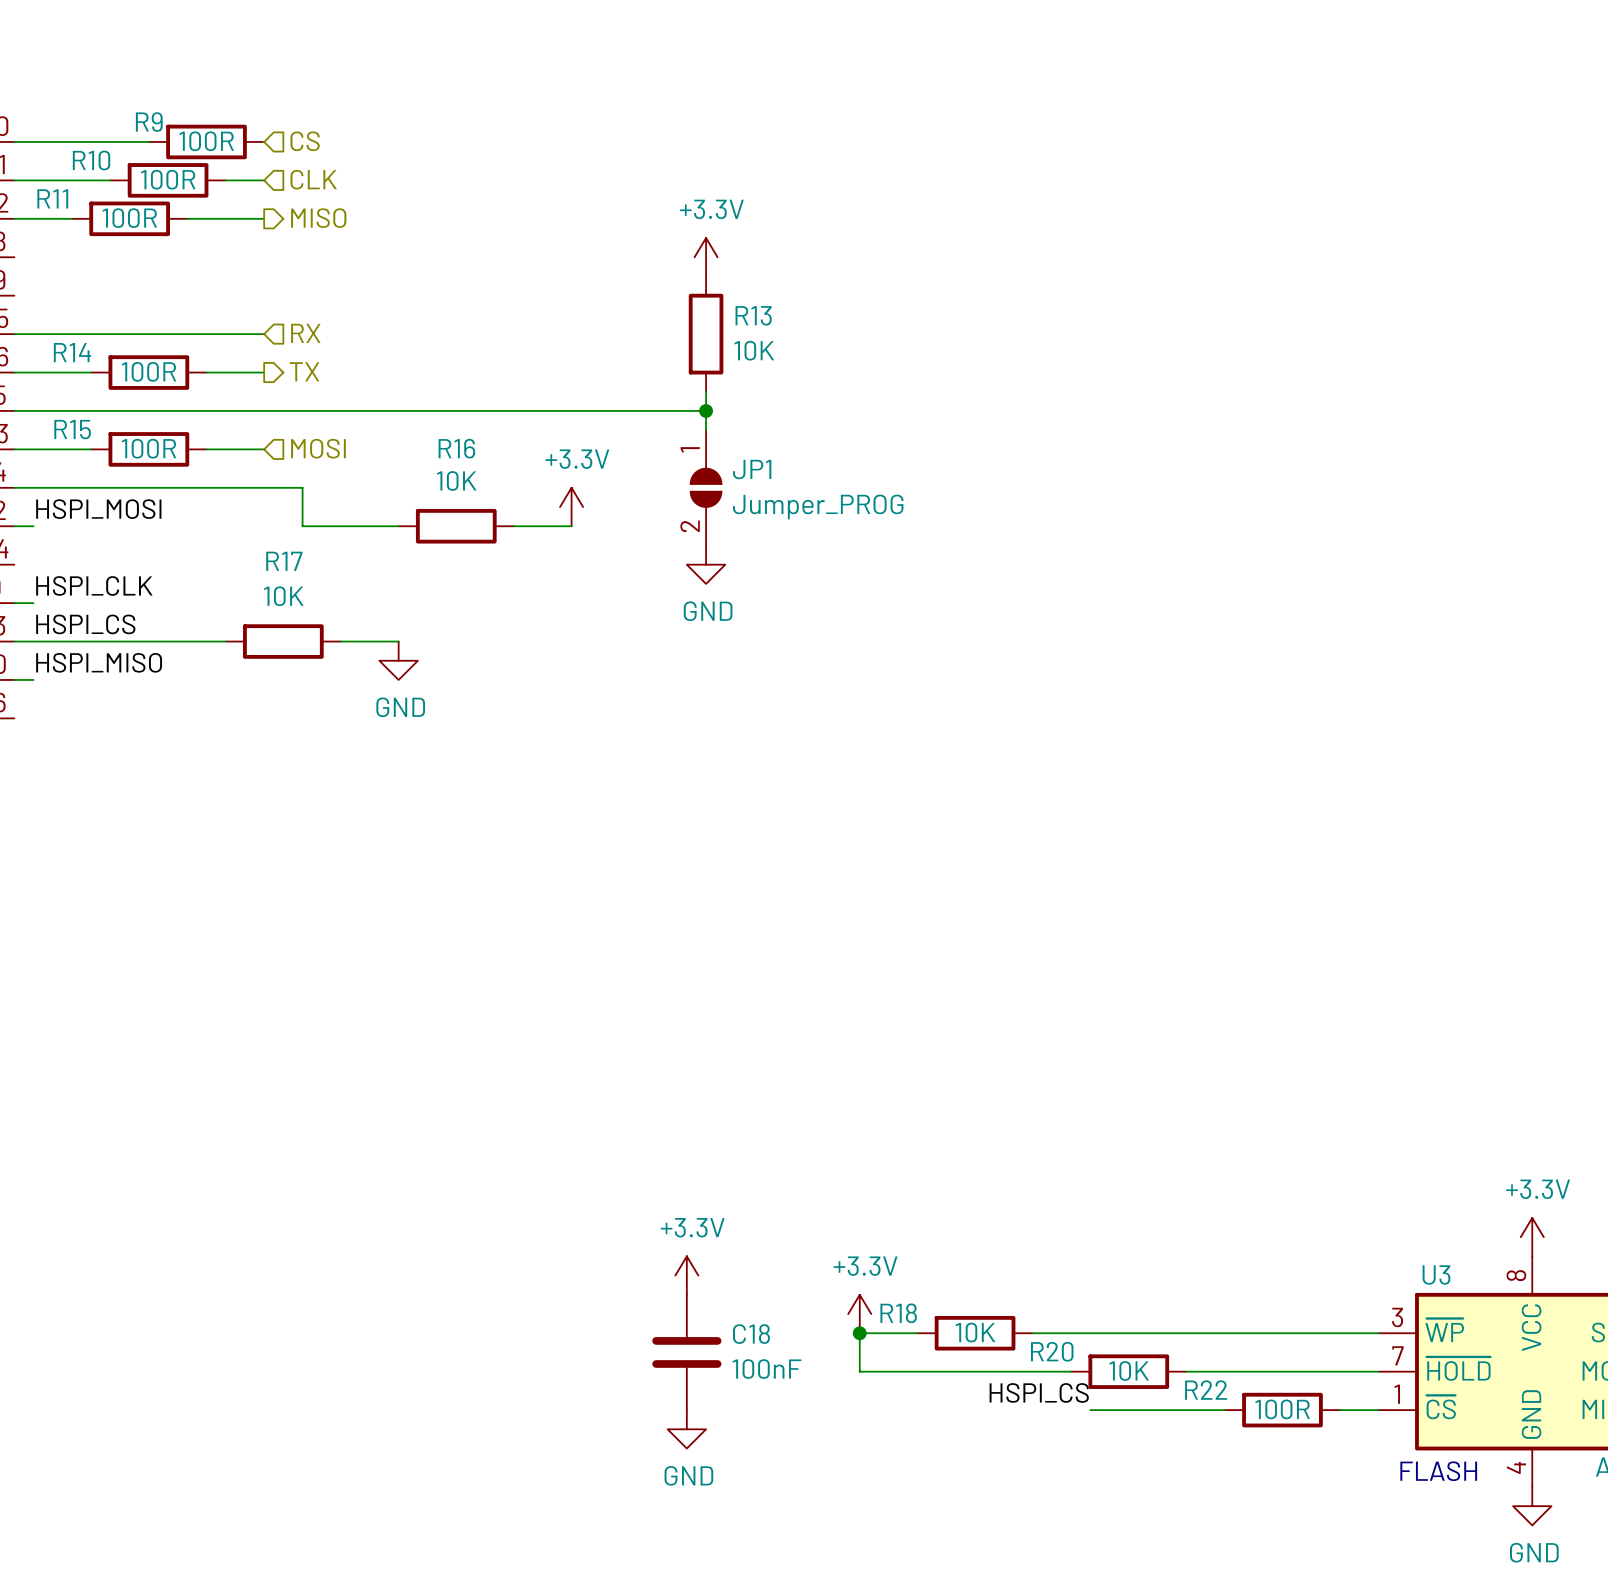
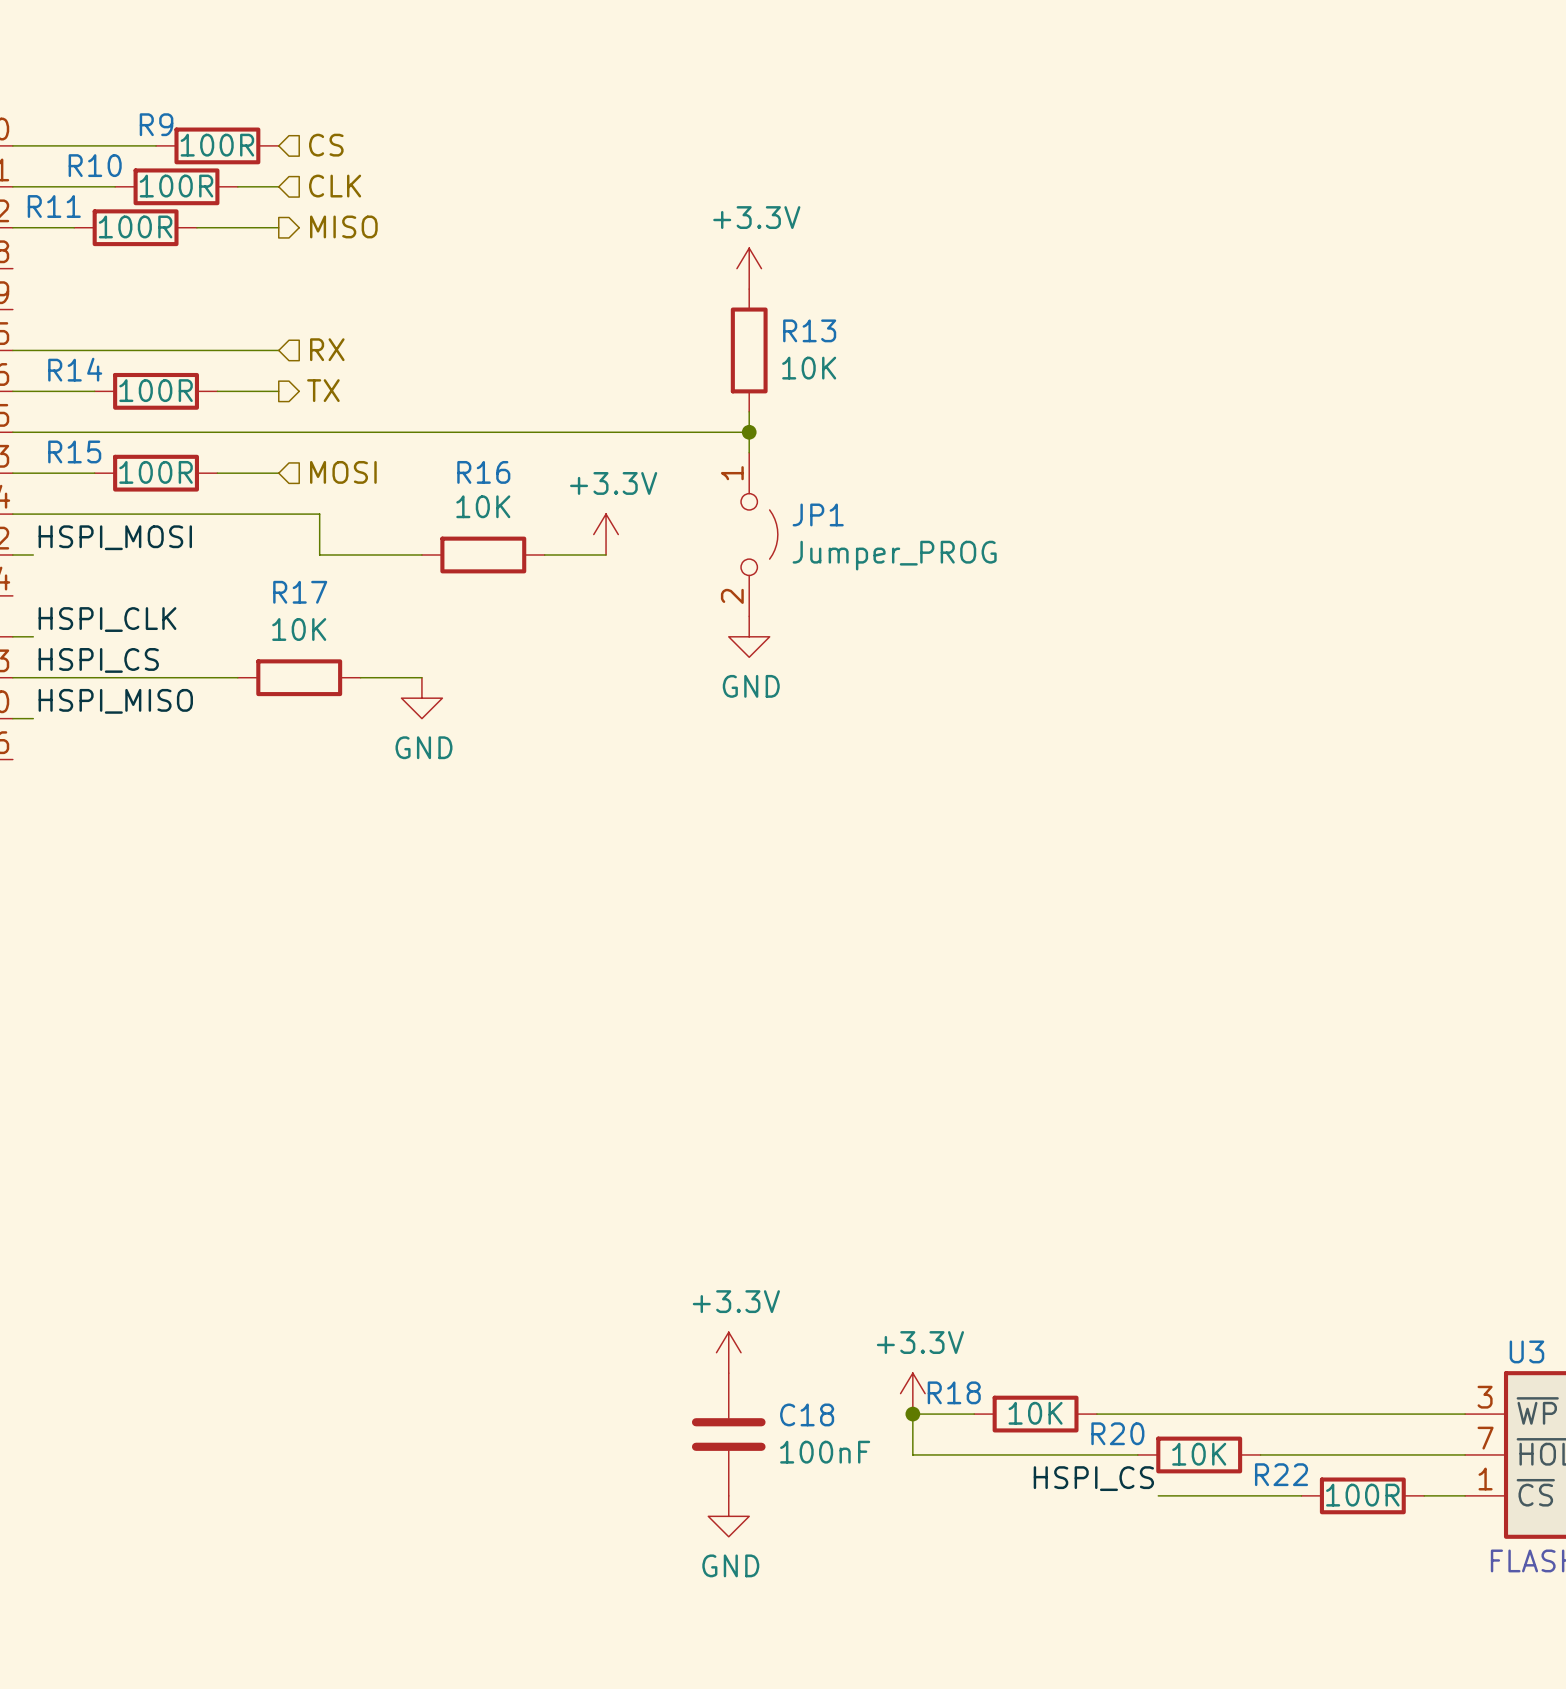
JP1 symbol: [690, 430, 722, 546] -> [741, 452, 778, 617]
power symbol position: GND (706, 564) -> GND (749, 636)

